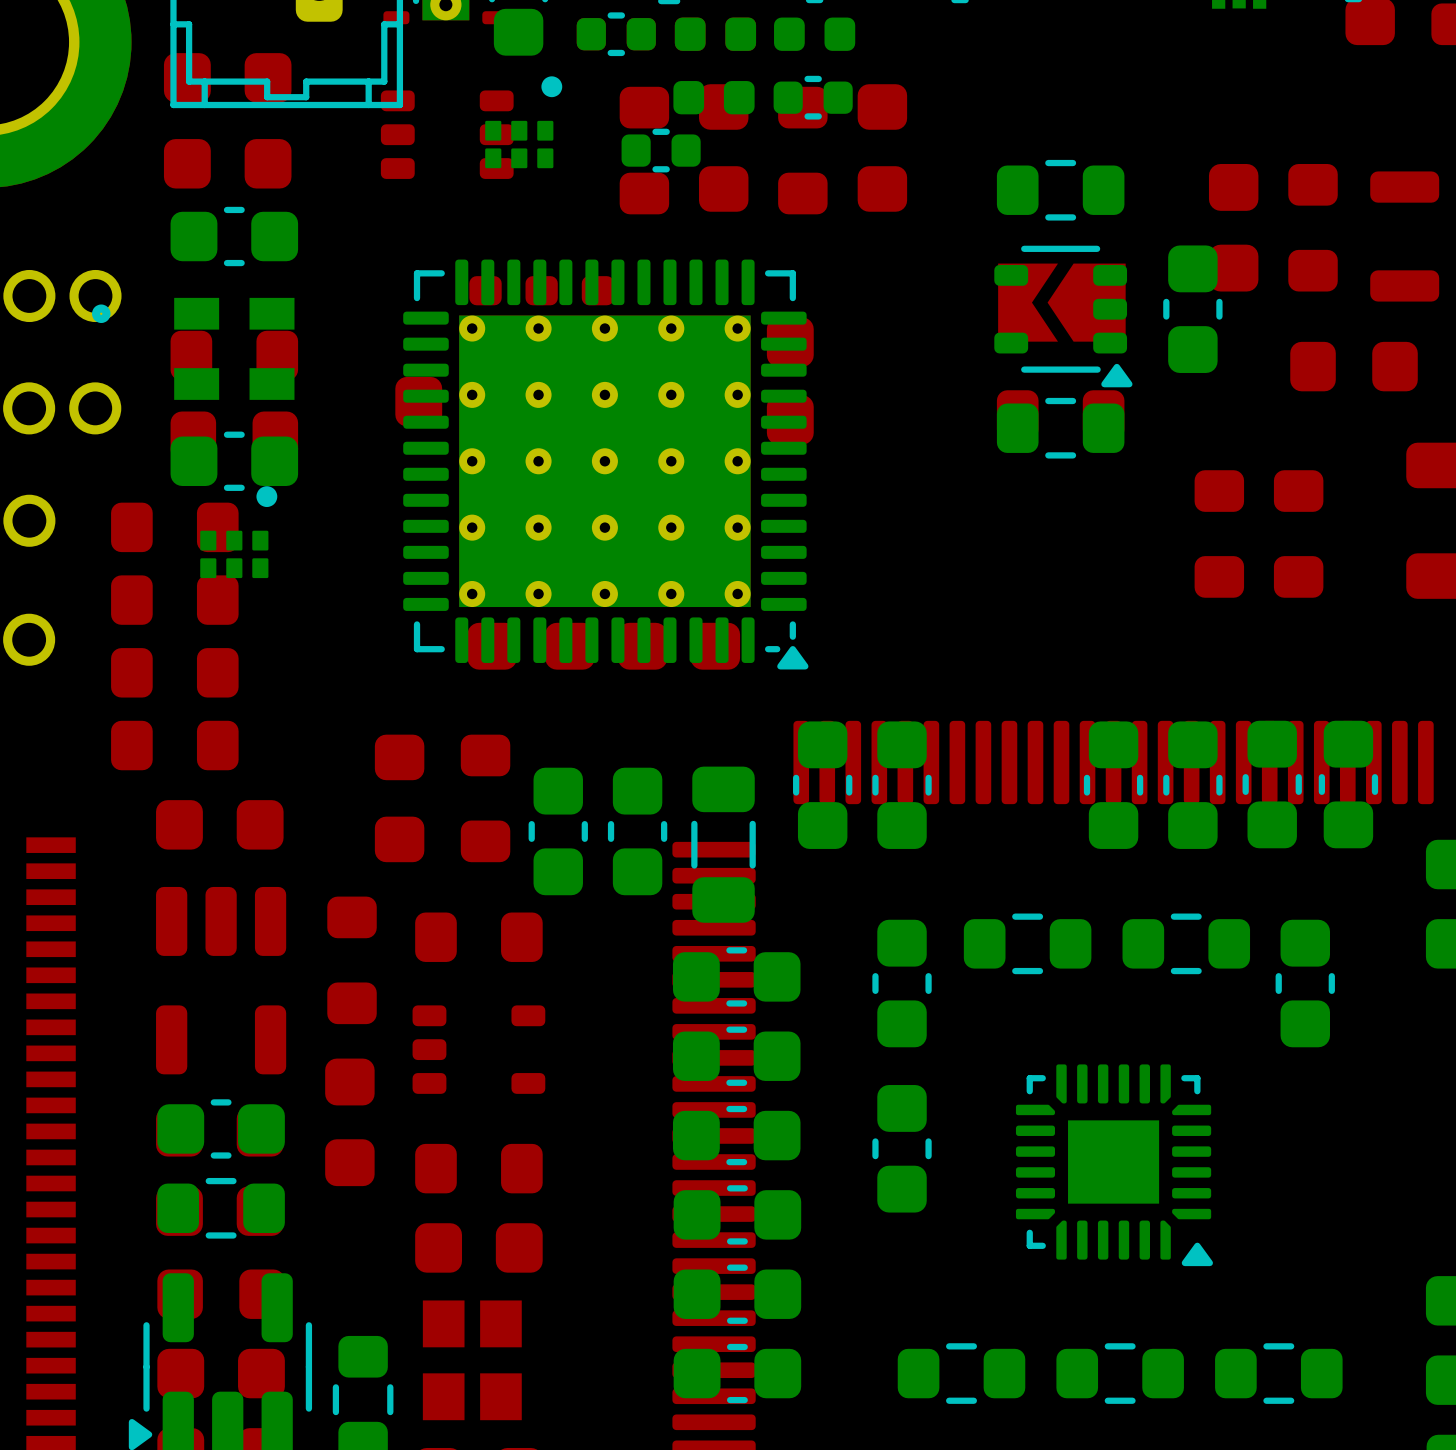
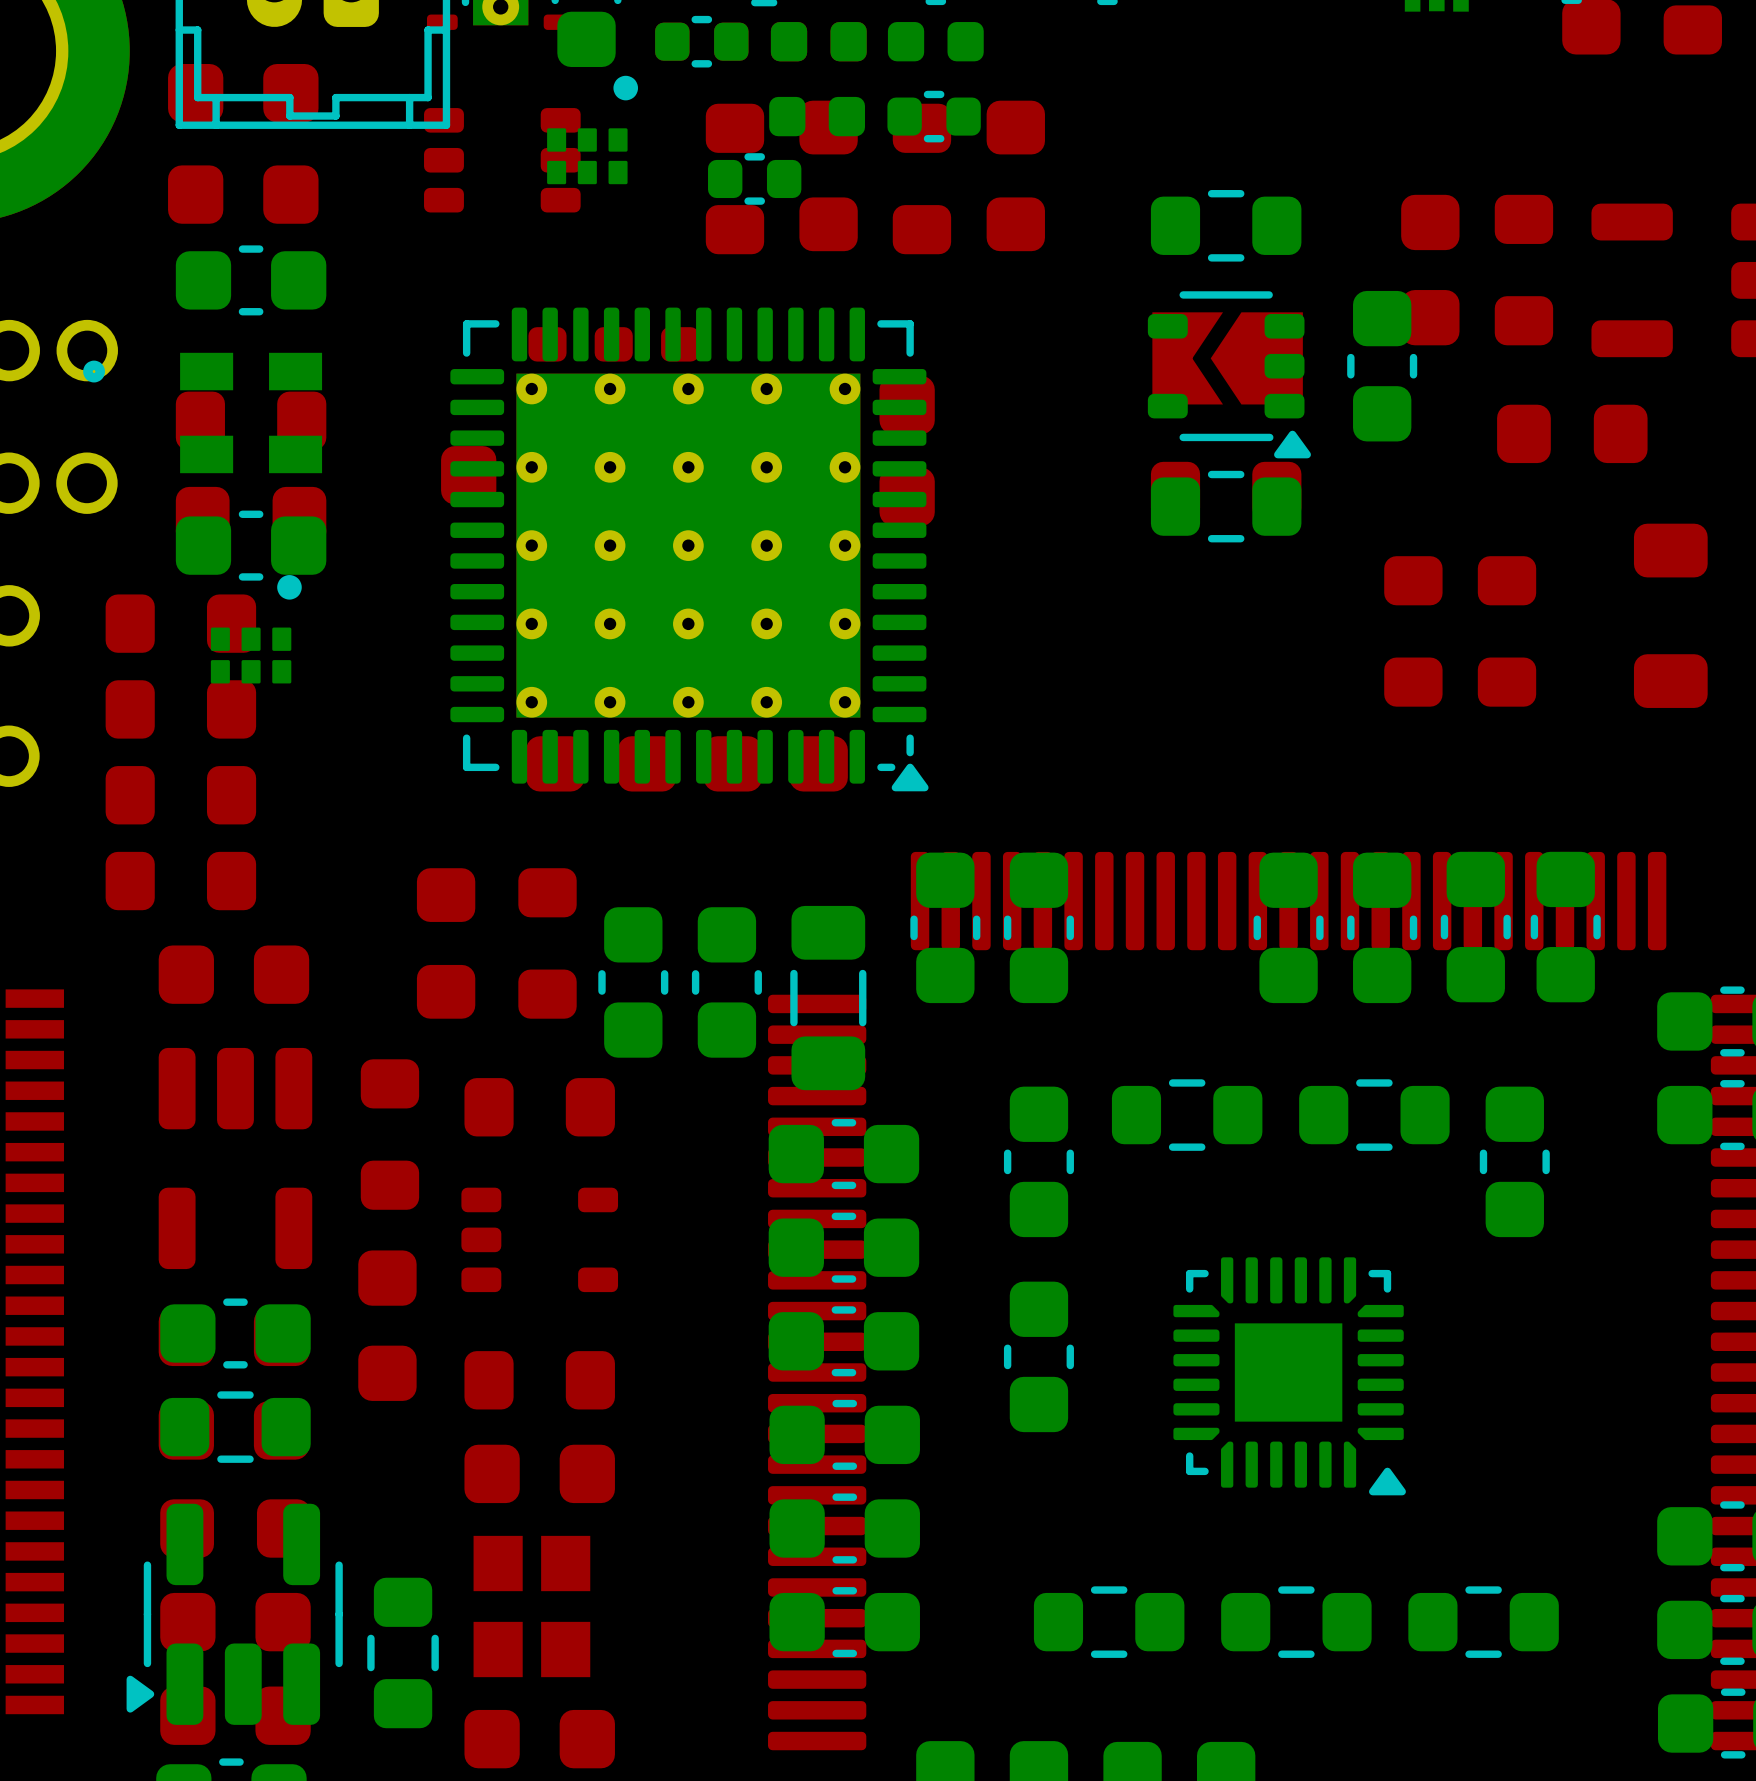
part position: (523, 122) -> (592, 129)

